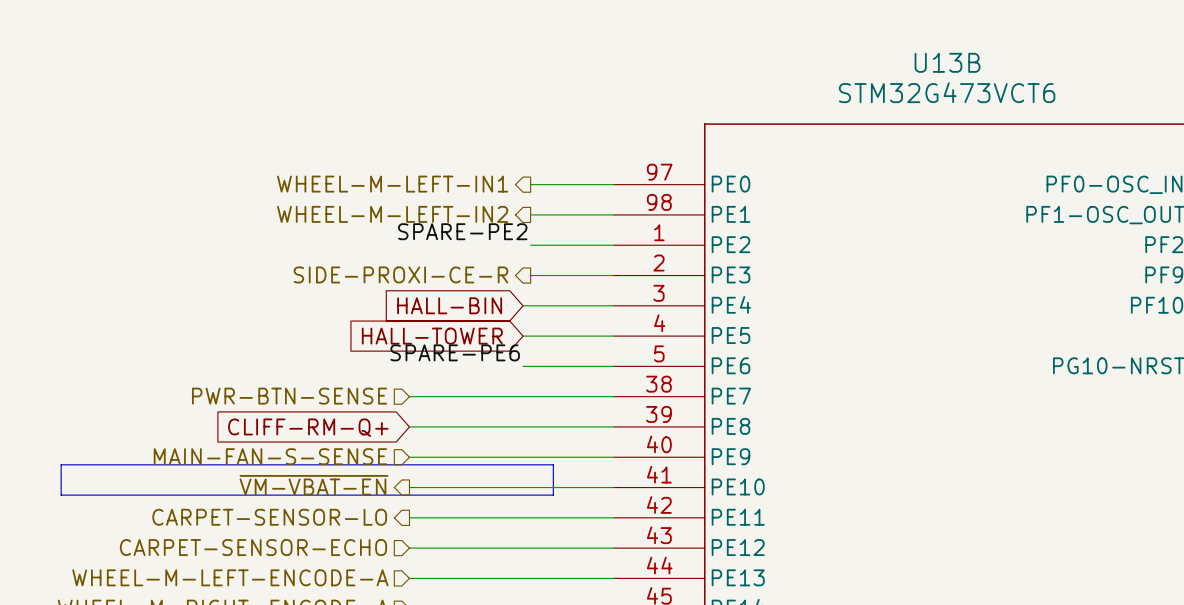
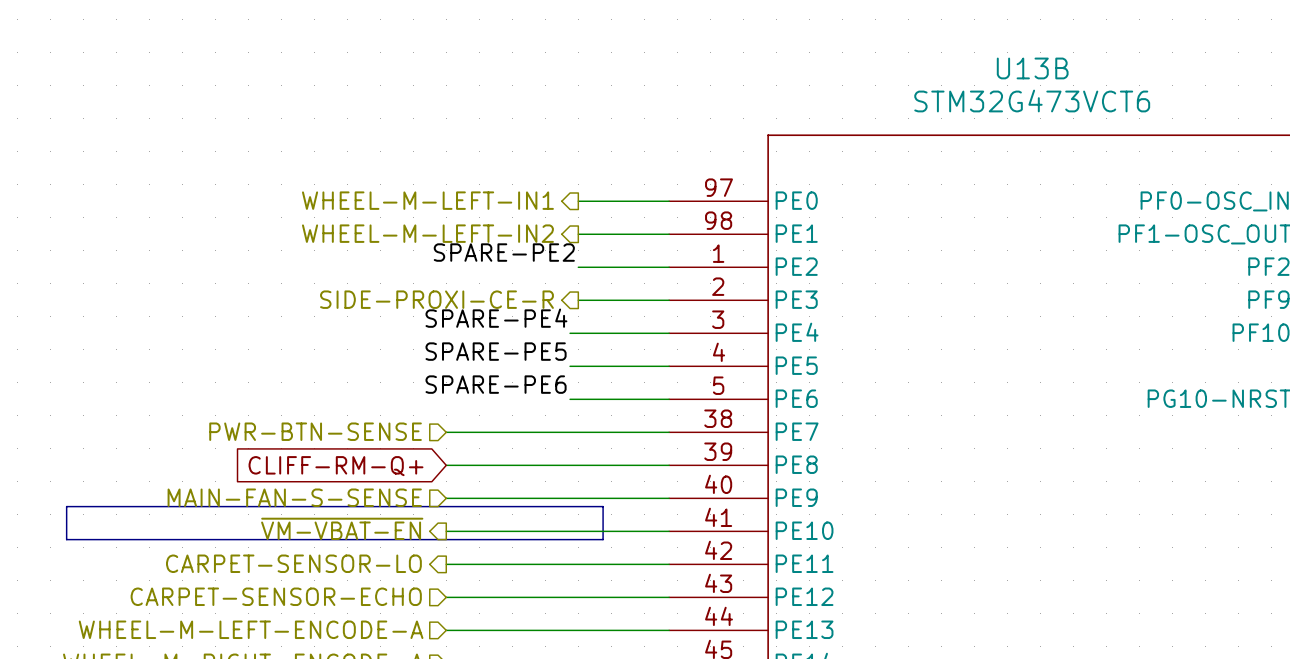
label: none -> SPARE-PE4 (496, 318)
global label: HALL-BIN (449, 305) -> none
label: none -> SPARE-PE5 (496, 351)
global label: HALL-TOWER (432, 336) -> none

